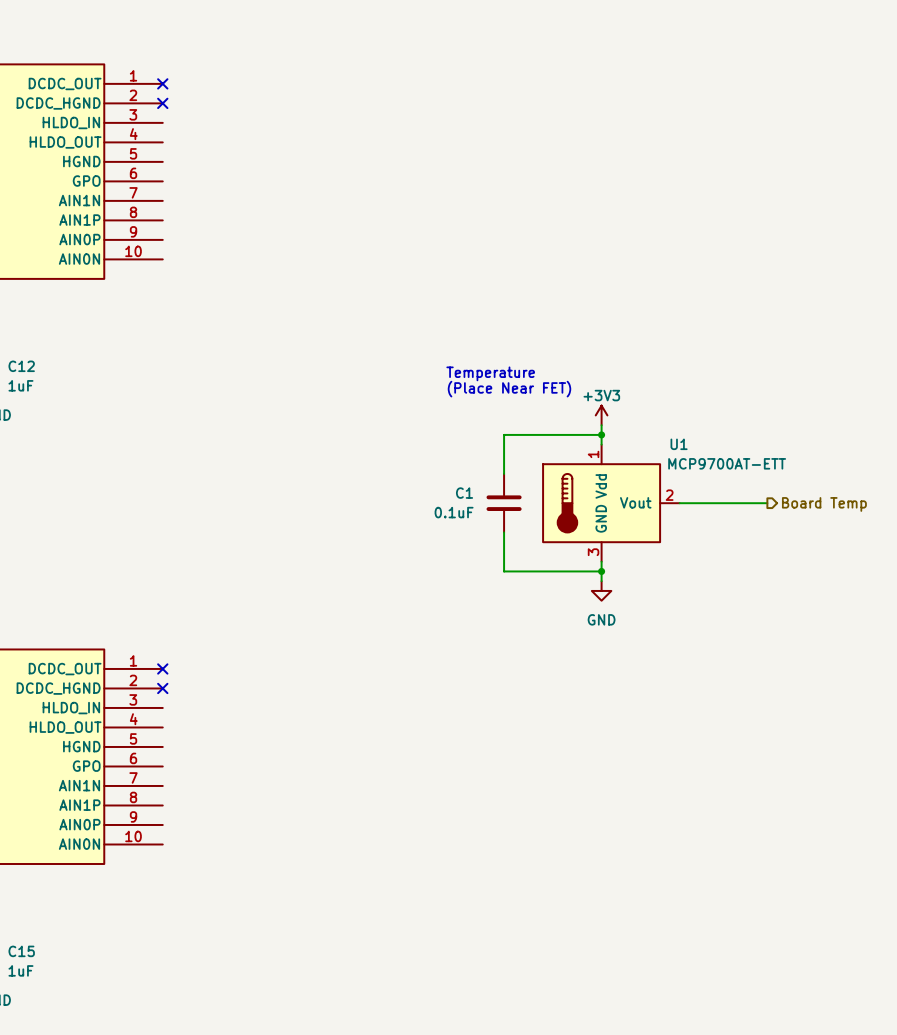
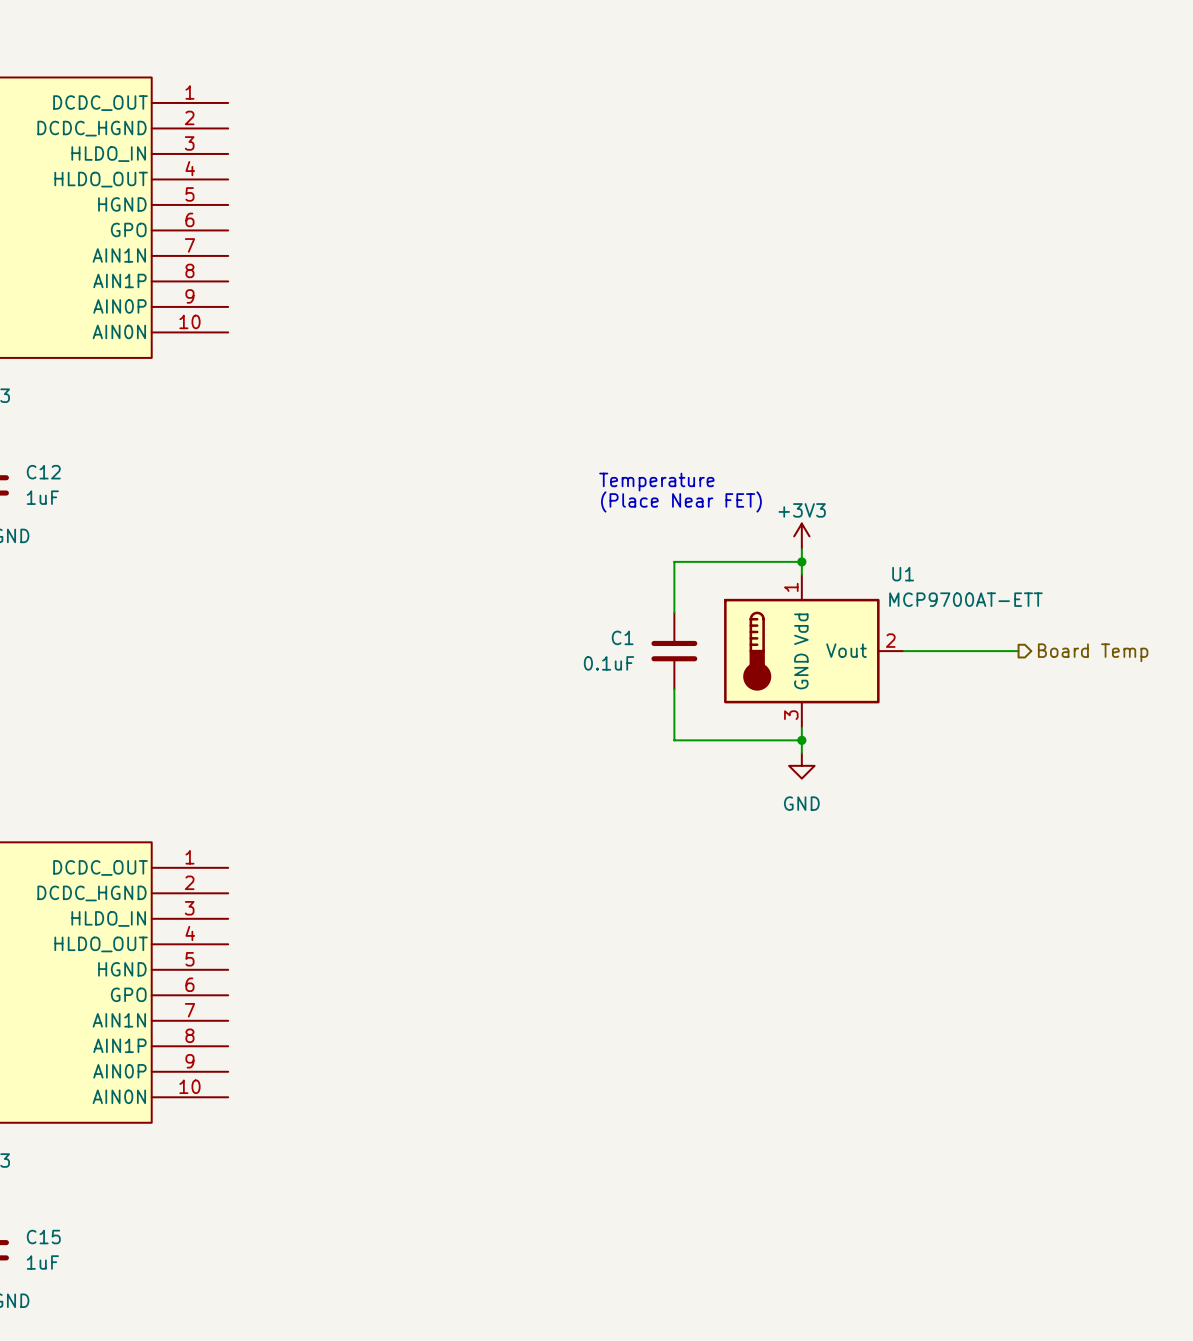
no-connect mark: (162, 83) -> none
no-connect mark: (162, 103) -> none
no-connect mark: (162, 668) -> none
no-connect mark: (162, 688) -> none

